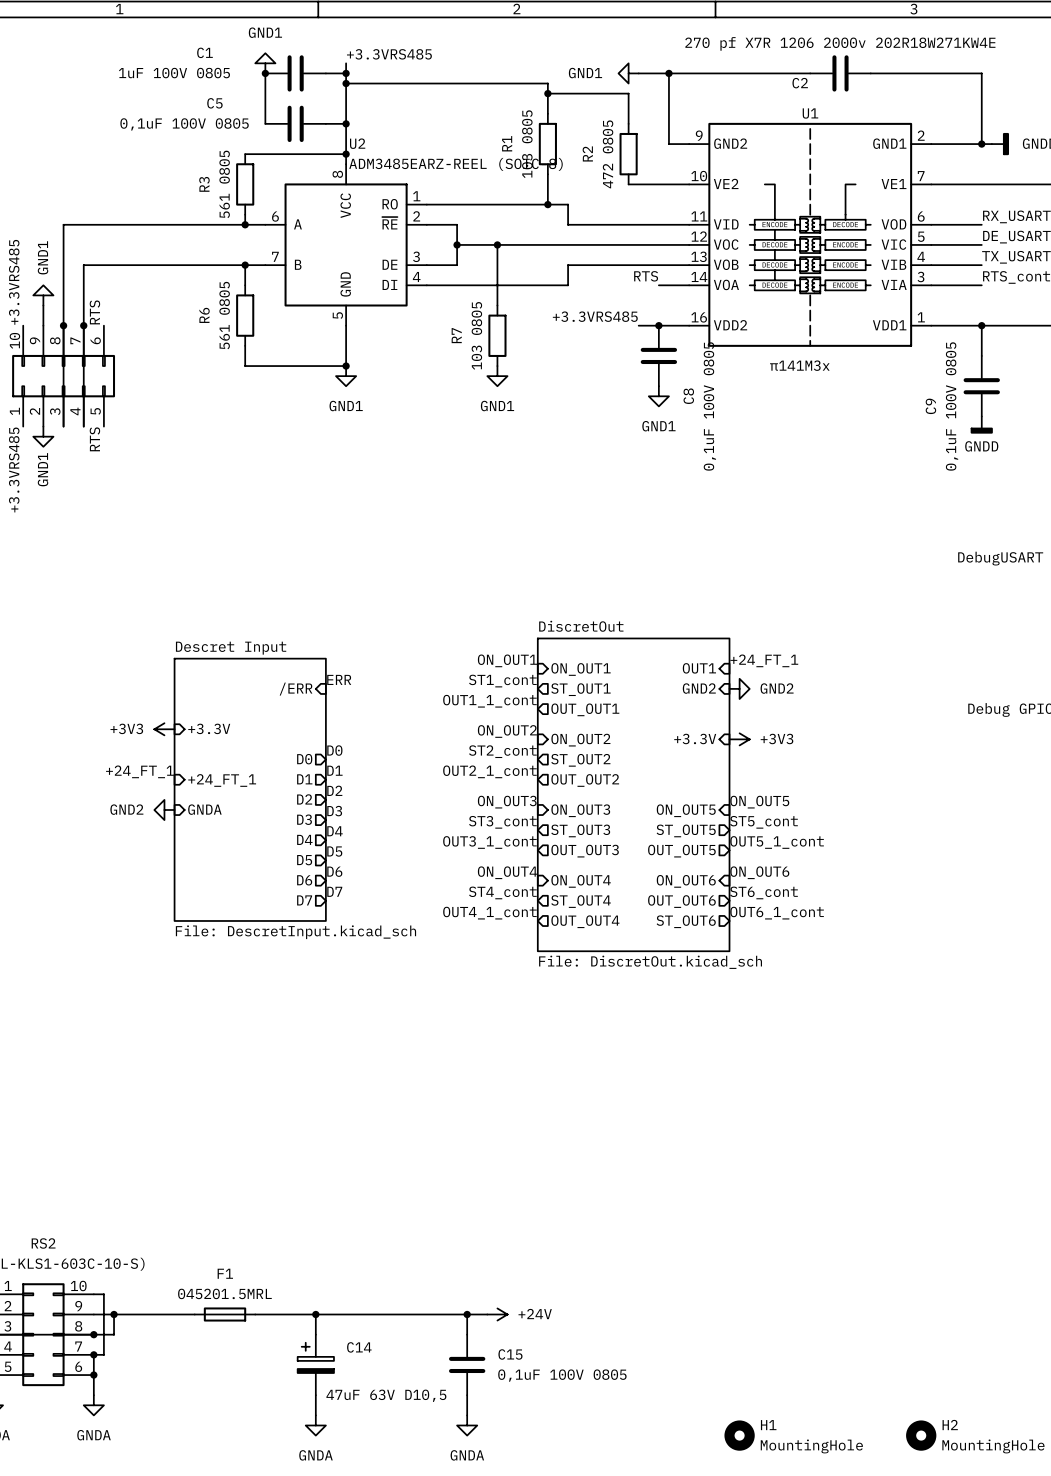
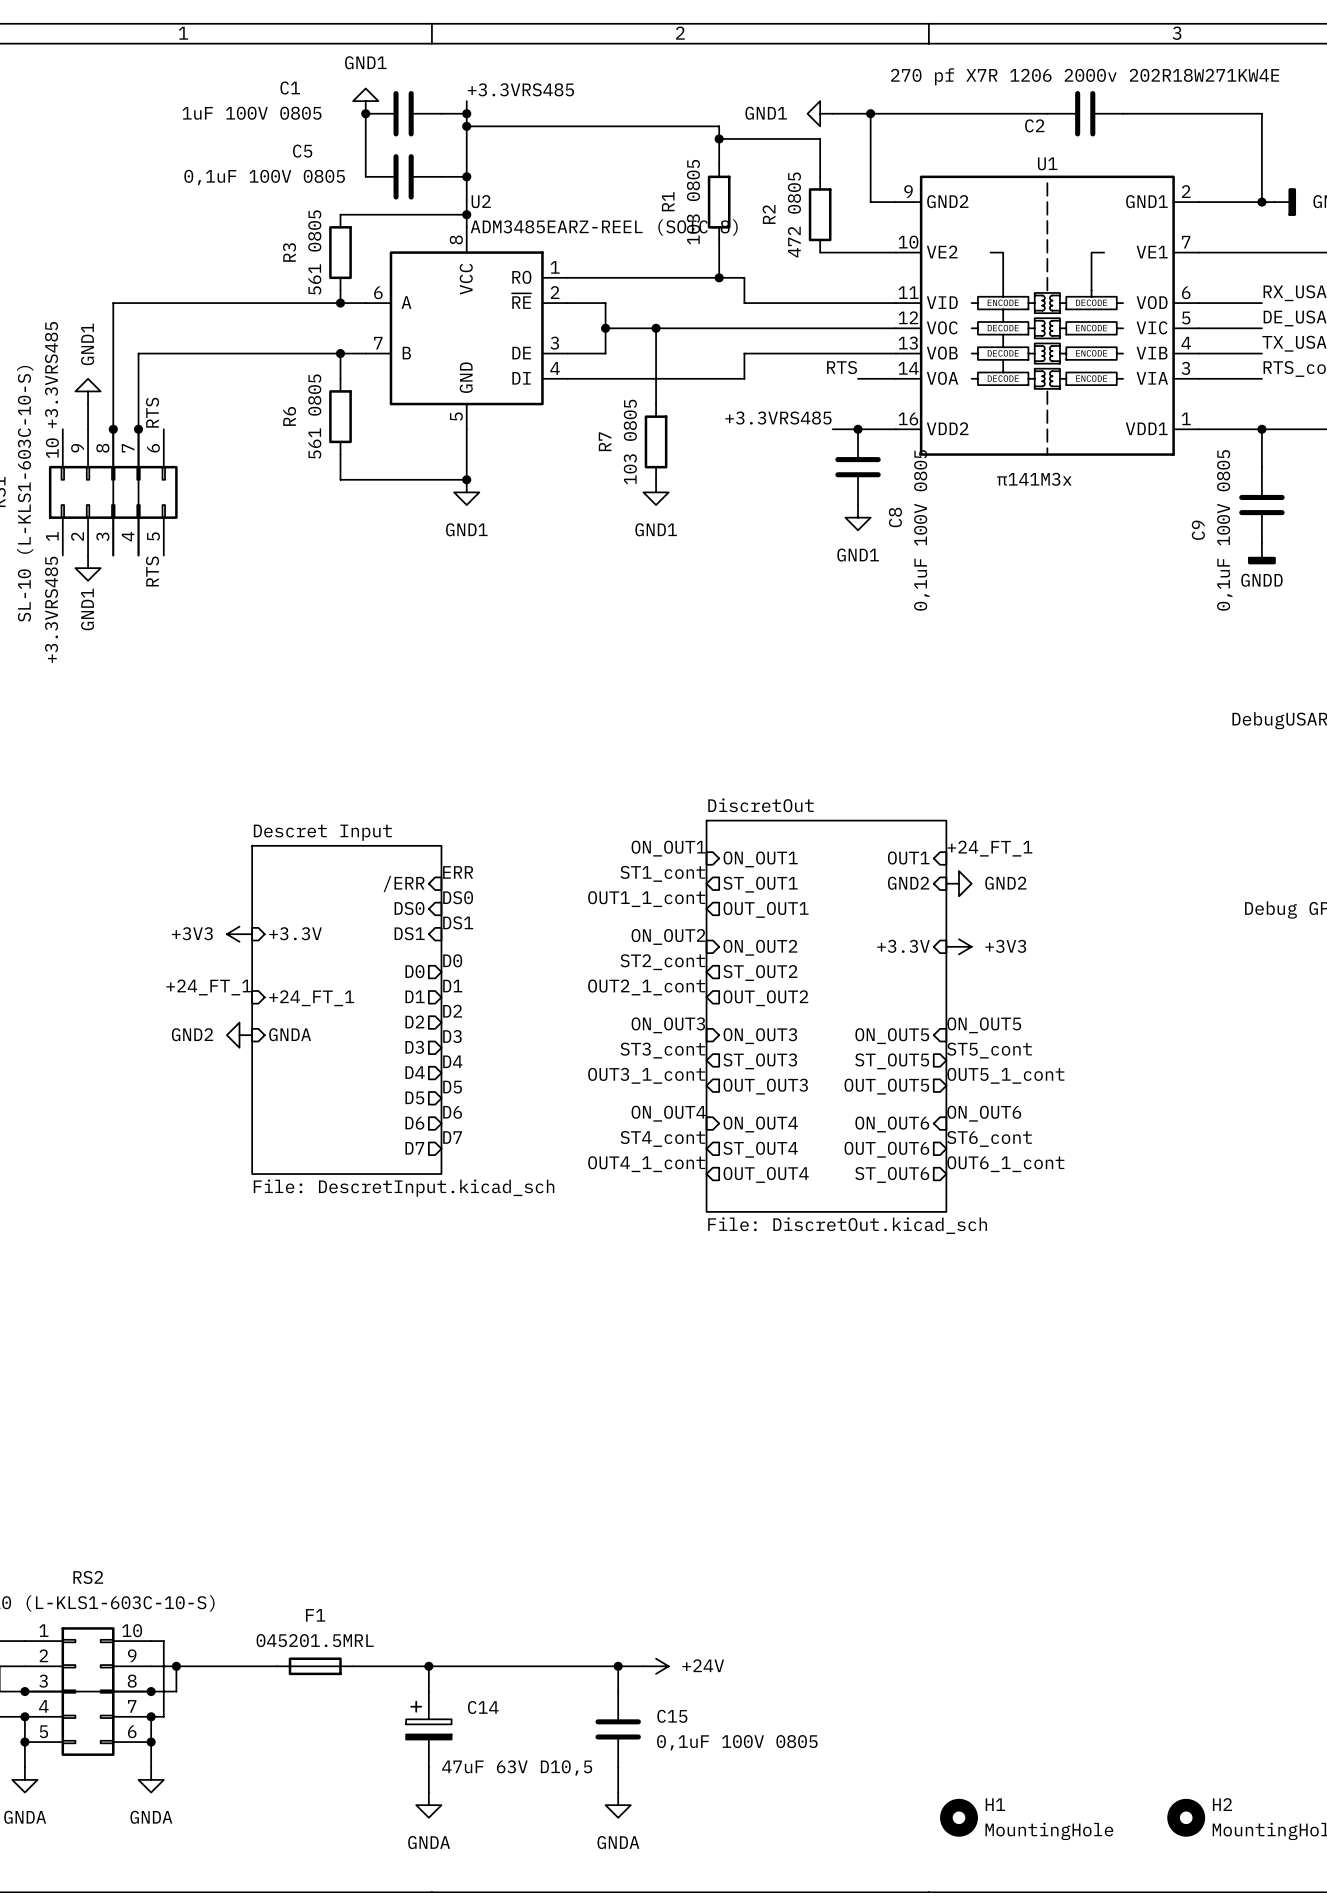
label: none -> DS0 (458, 897)
sheet pin: none -> DS0 (409, 908)
label: none -> DS1 (458, 922)
sheet pin: none -> DS1 (409, 933)

